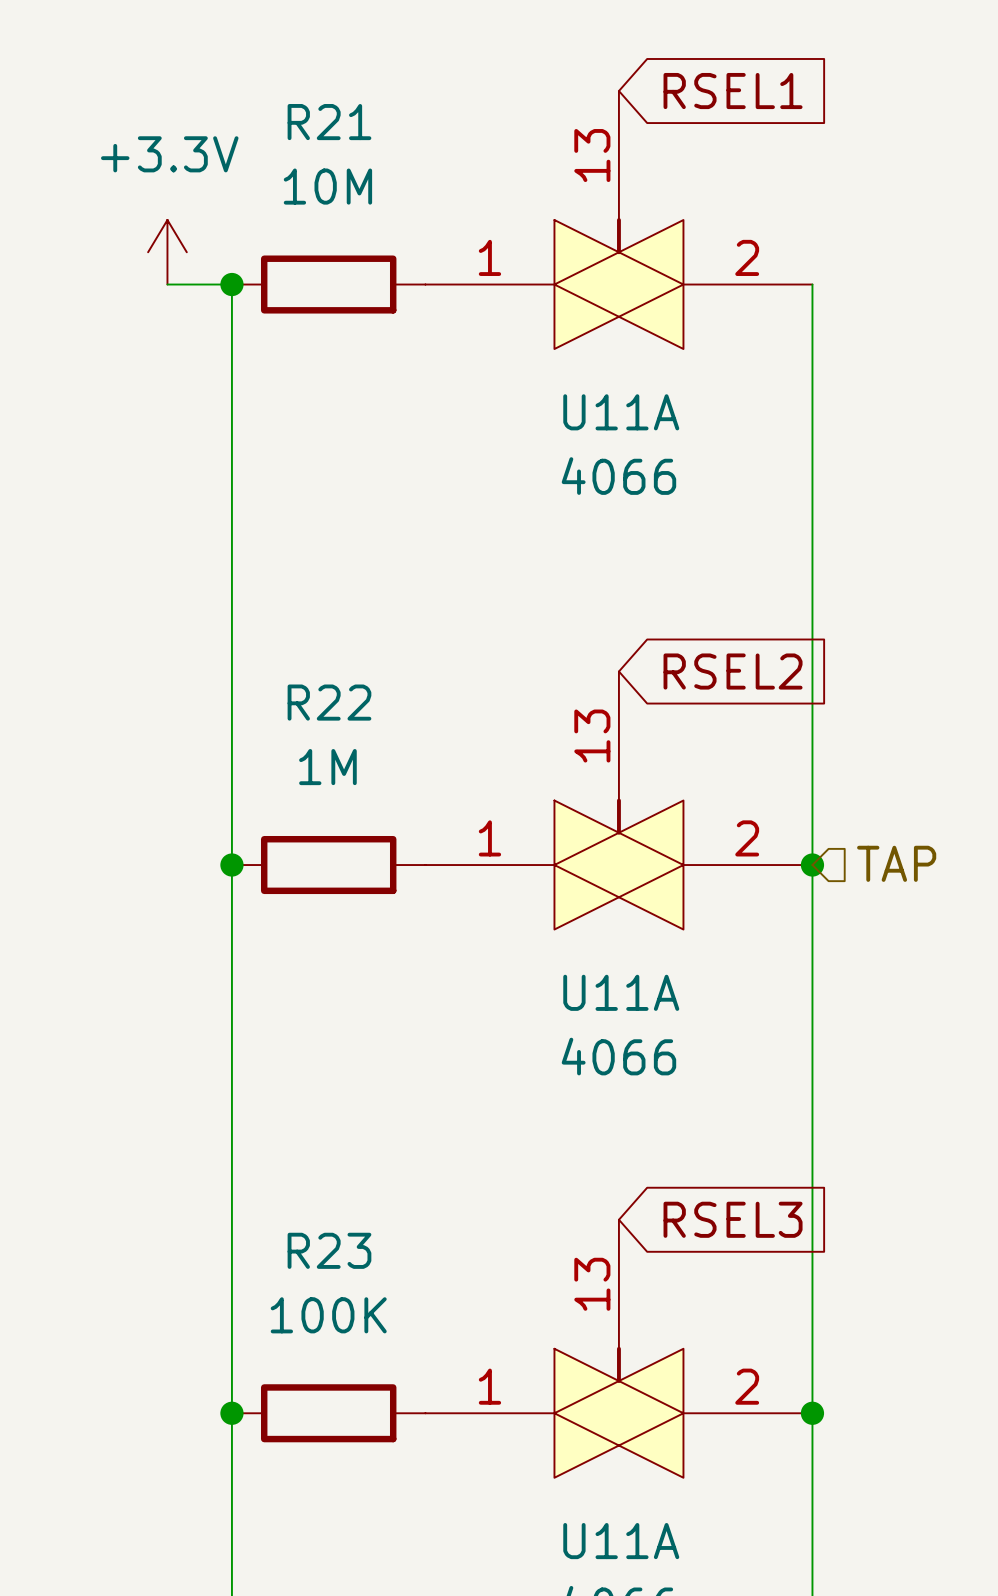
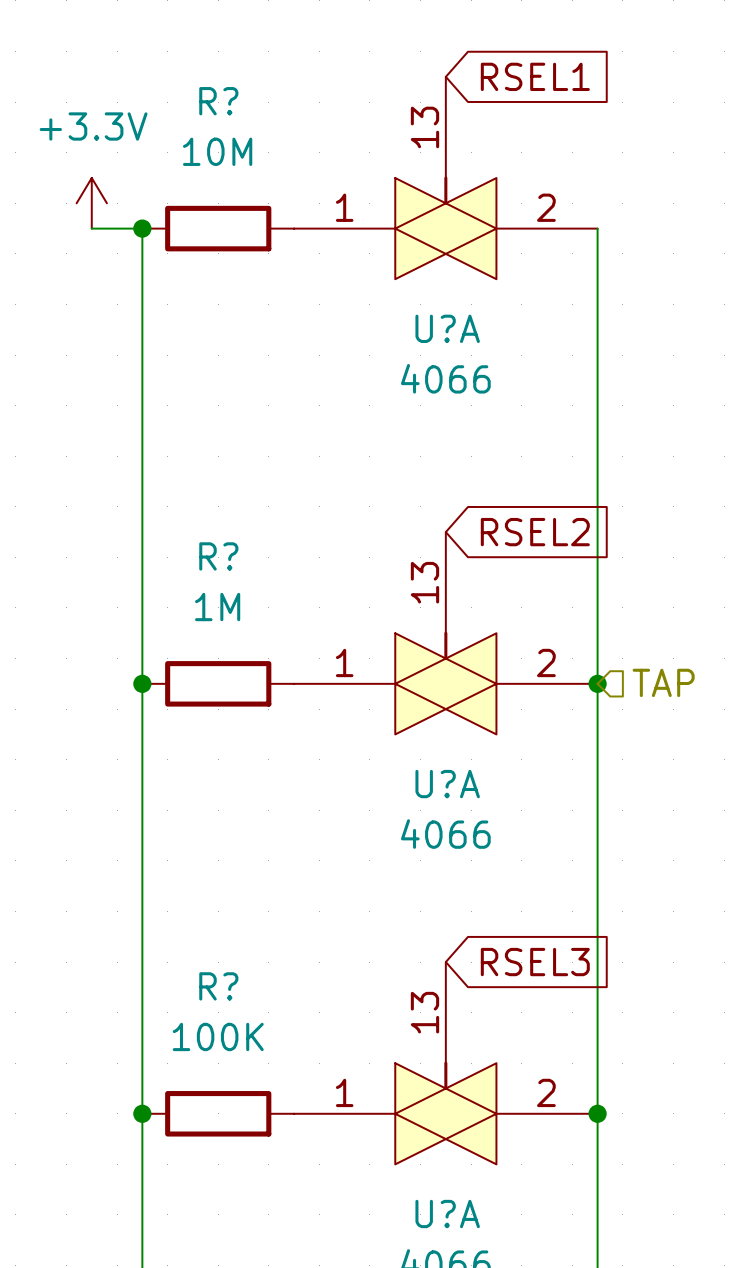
R21 name: R21 (329, 122) -> R? (218, 101)
U11A name: U11A (621, 412) -> U?A (447, 328)
R22 name: R22 (329, 702) -> R? (218, 556)
U11A name: U11A (621, 992) -> U?A (447, 784)
R23 name: R23 (329, 1250) -> R? (218, 986)
U11A name: U11A (621, 1541) -> U?A (447, 1214)

